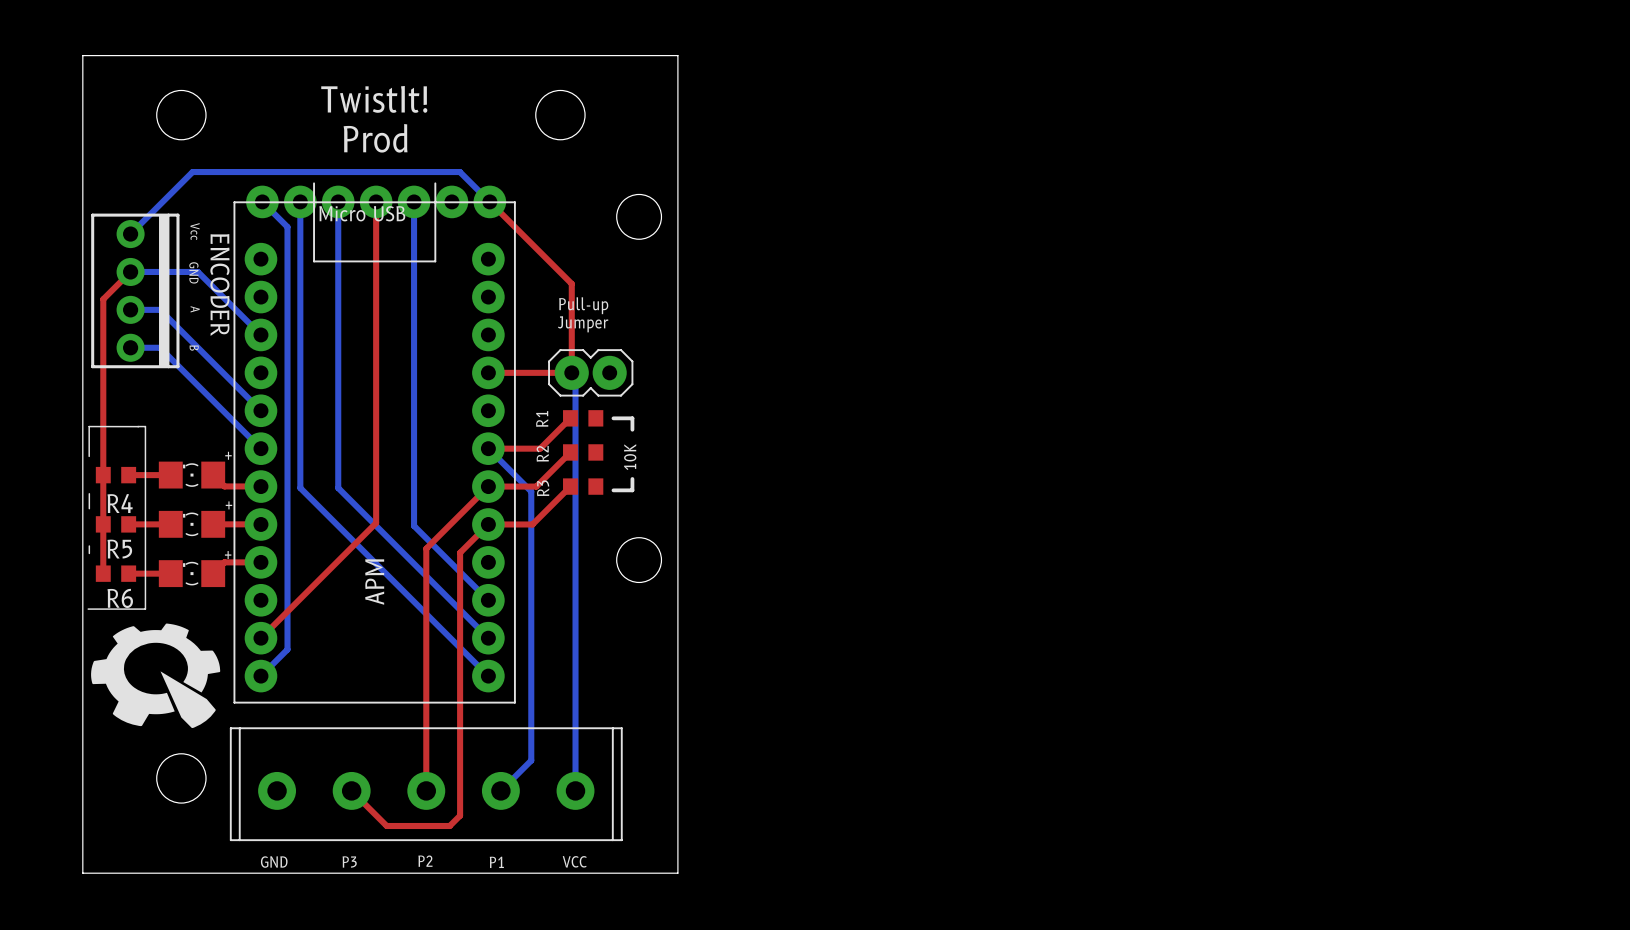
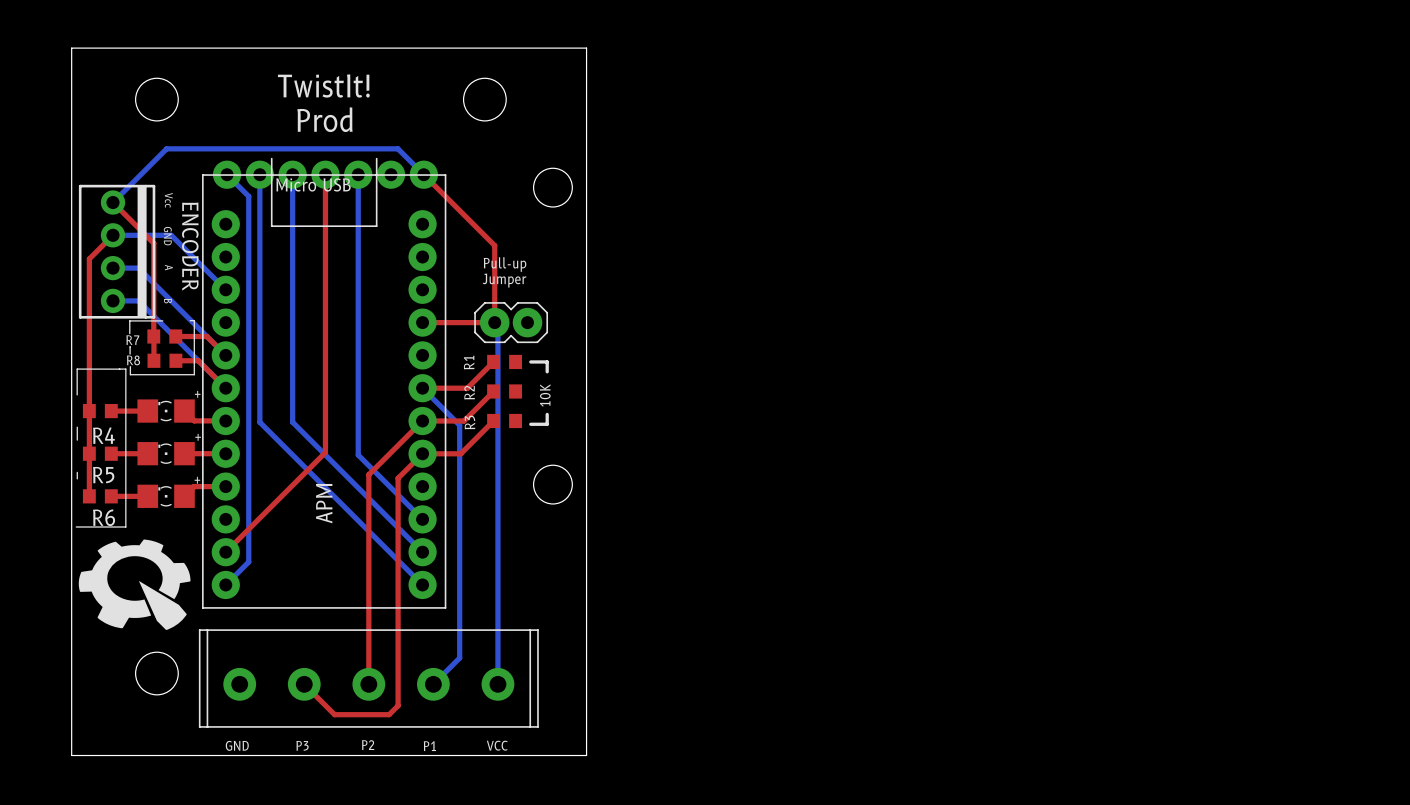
top track: none -> (112, 202) (153, 243) (153, 336)
line: none -> (162, 320) (129, 320) (129, 333)
line: none -> (190, 320) (194, 320) (194, 374) (130, 374) (130, 366)
R7: none -> (164, 336)
top track: none -> (175, 336) (206, 336) (225, 355)
top track: none -> (153, 336) (153, 360)
line: none -> (130, 346) (130, 354)
R8: none -> (164, 360)
top track: none -> (175, 360) (198, 360) (225, 388)

